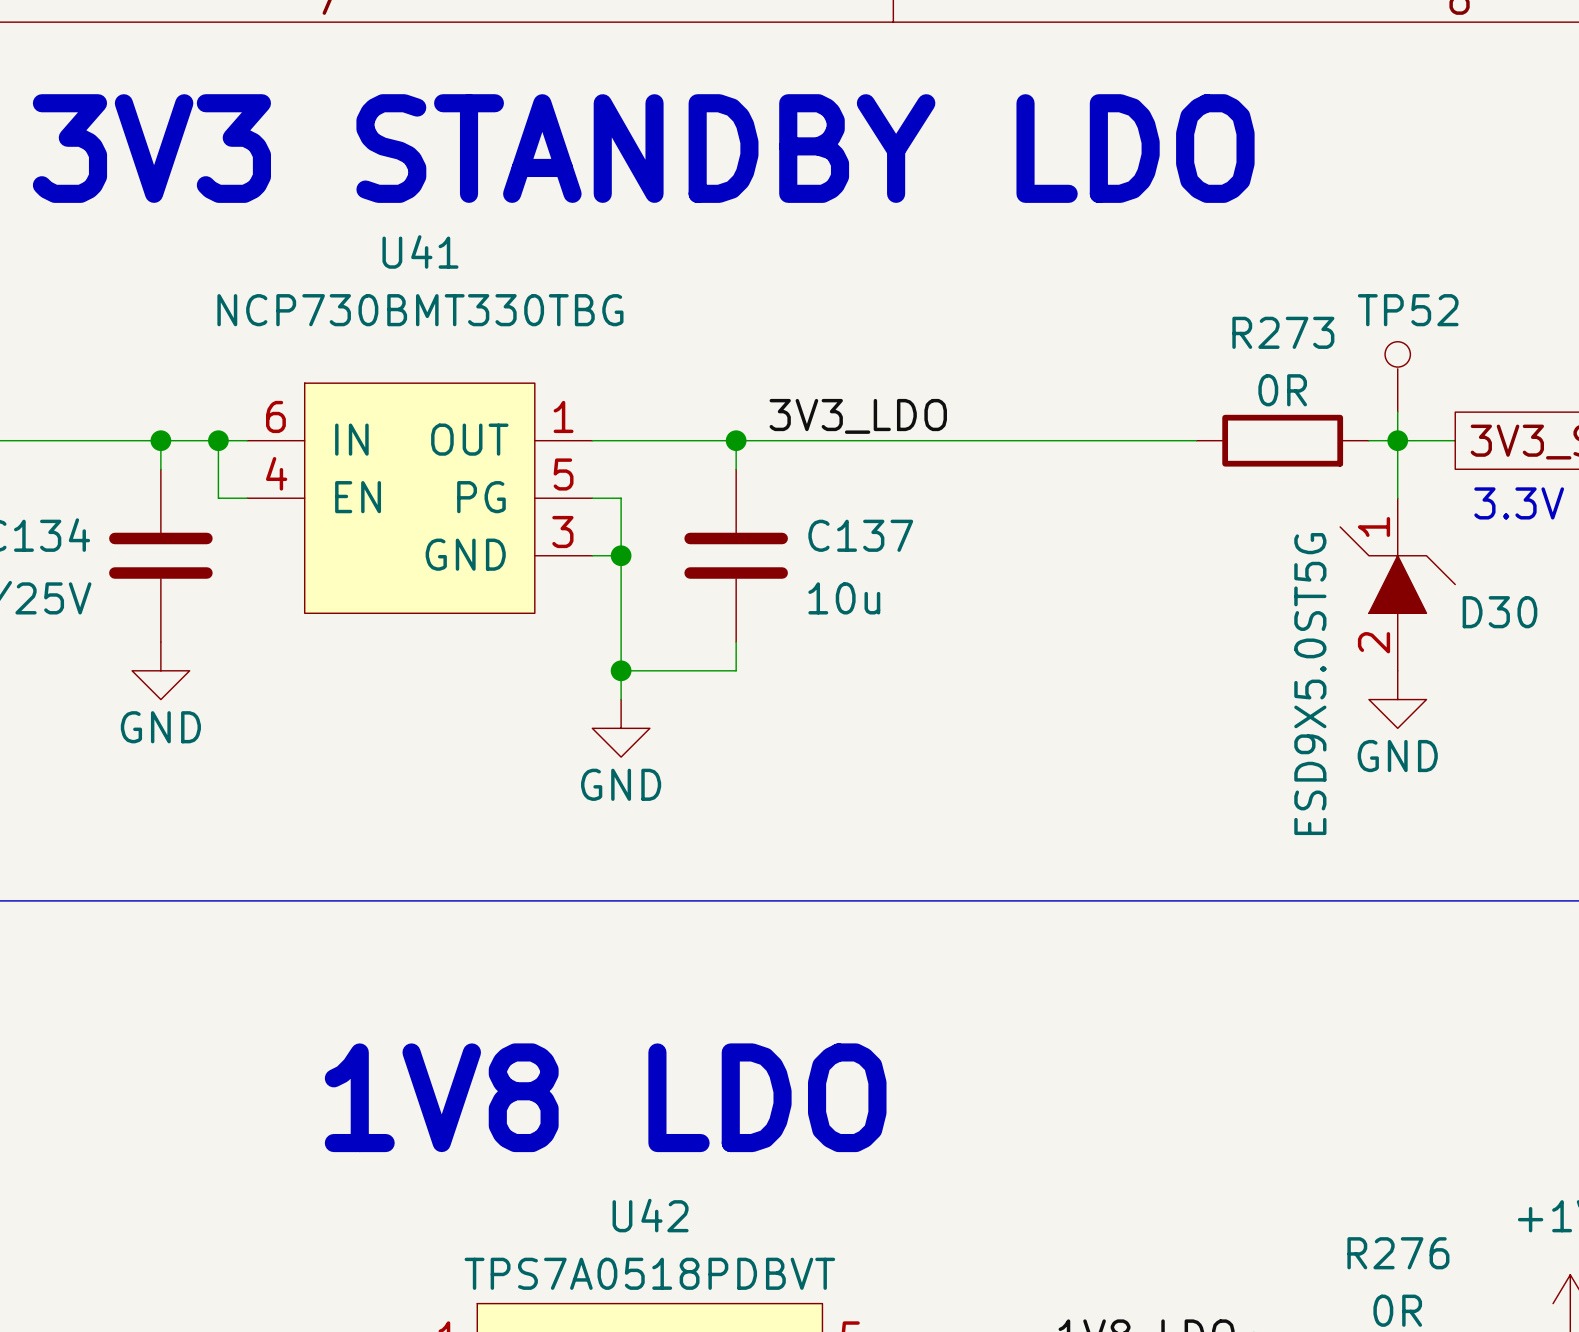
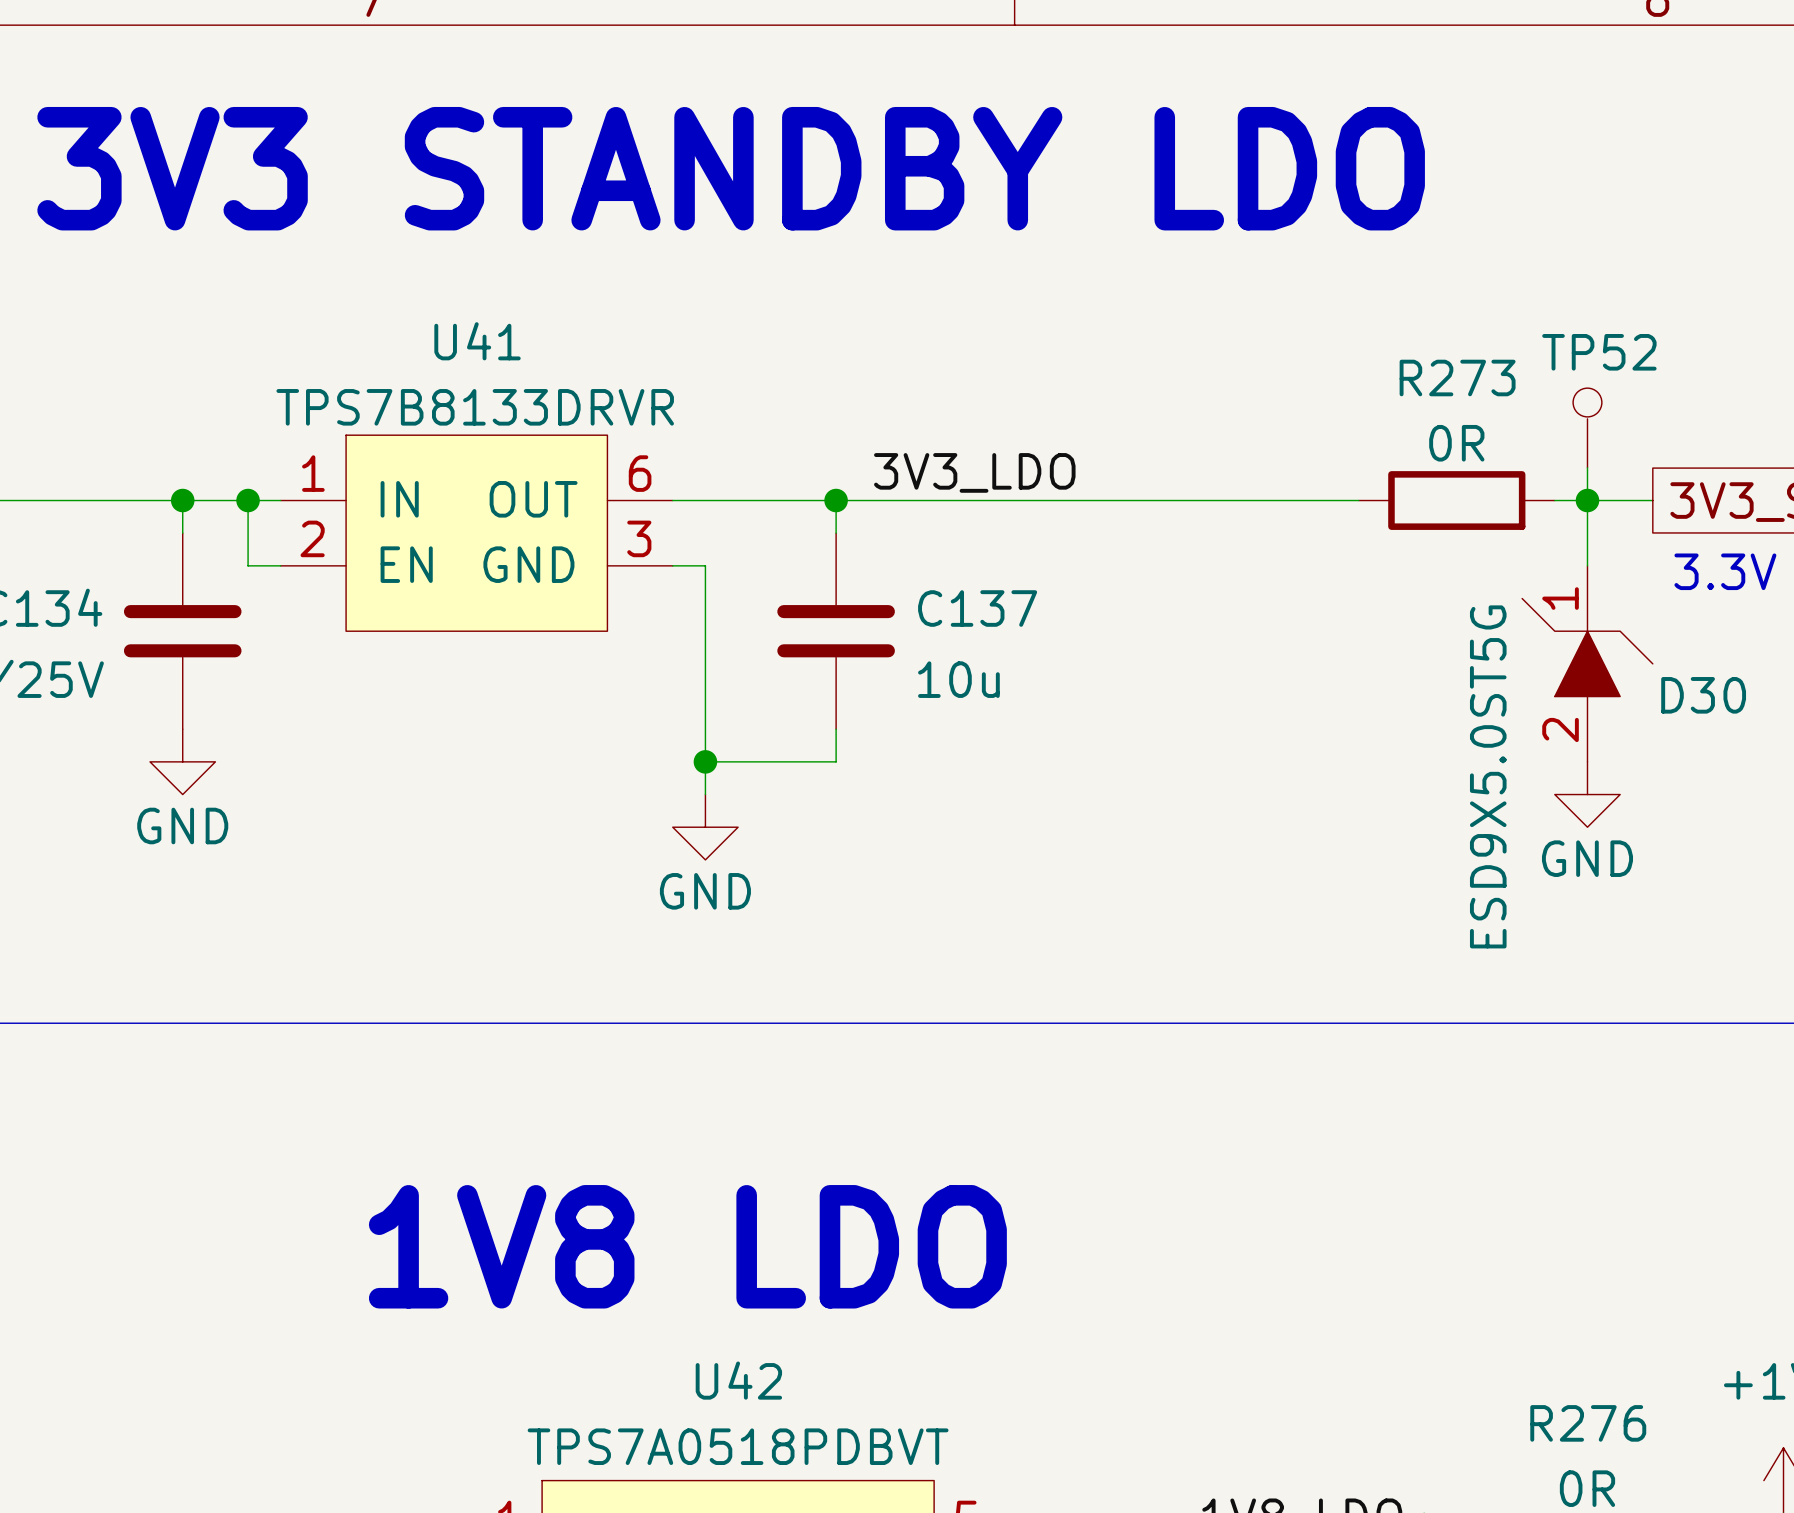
U41 name position: U41 (420, 251) -> U41 (477, 341)
U41 value: NCP730BMT330TBG (420, 310) -> TPS7B8133DRVR (475, 407)
U41 symbol: [247, 383, 593, 614] -> [280, 435, 673, 632]
wire: (592, 555) (621, 555) -> none
junction: (621, 555) -> none

